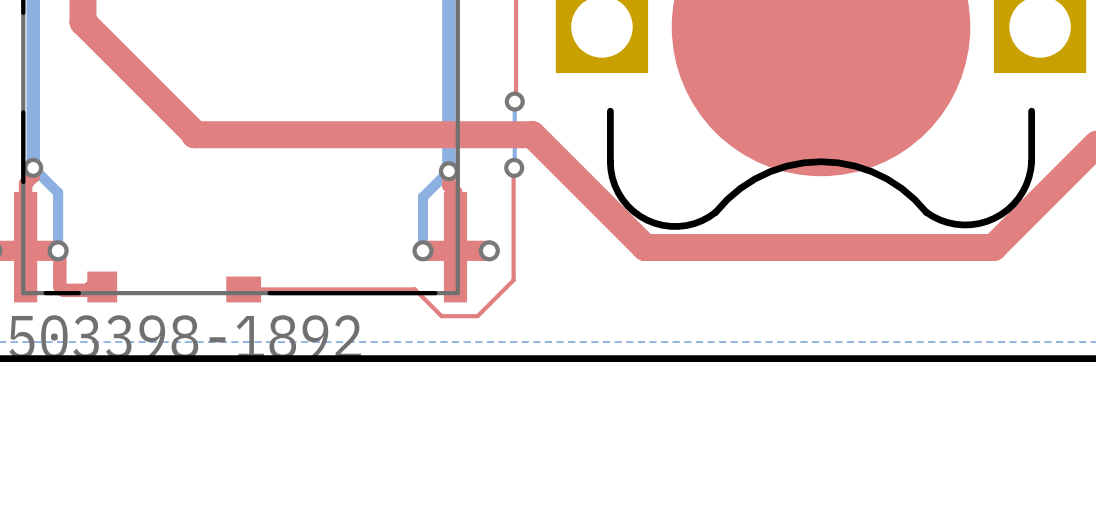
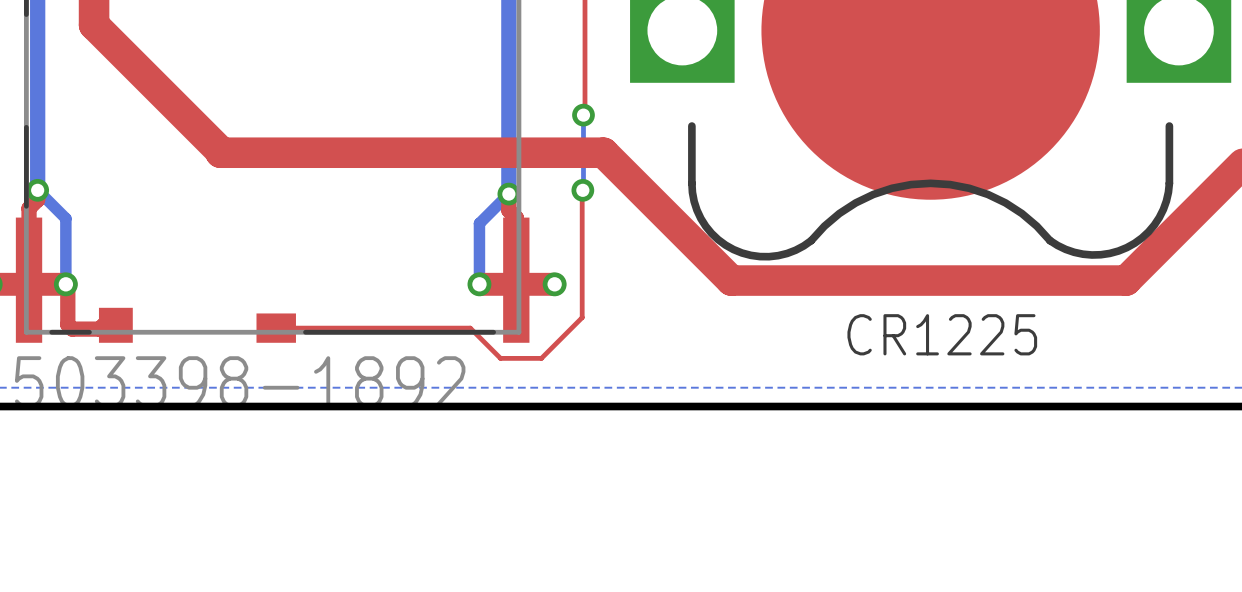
text: none -> CR1225 (942, 334)

